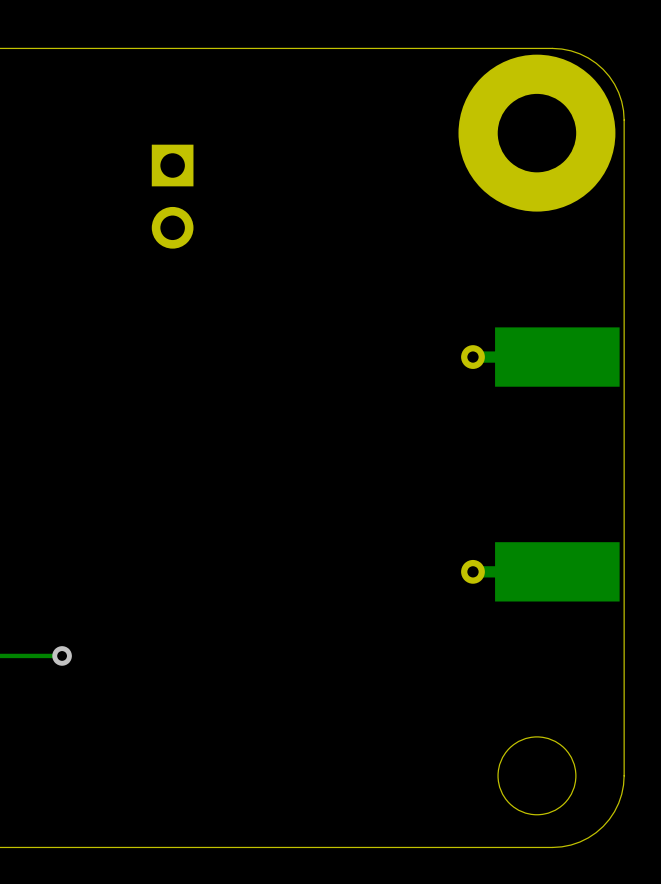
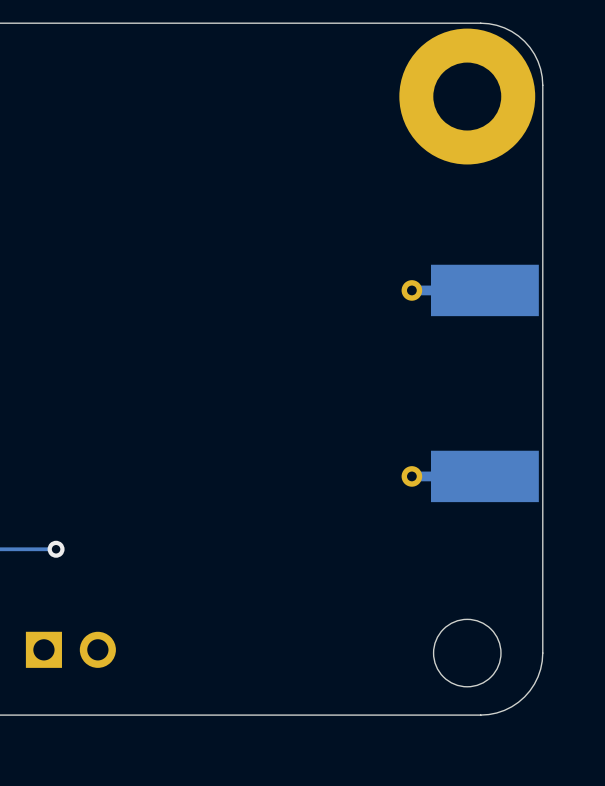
part rotation: 0° (172, 196) -> 90° counterclockwise (70, 649)
part position: (172, 196) -> (70, 649)

